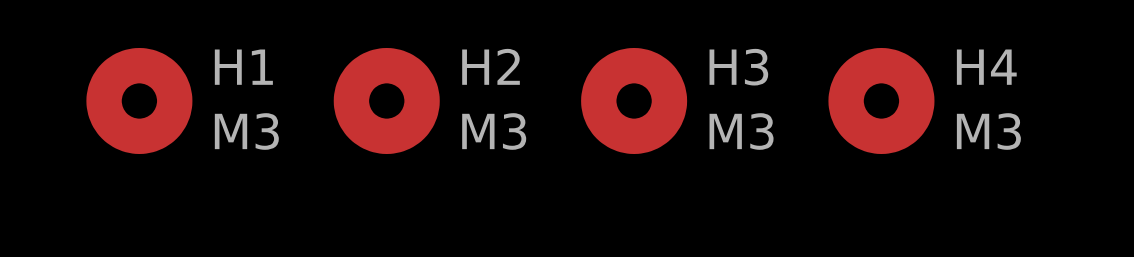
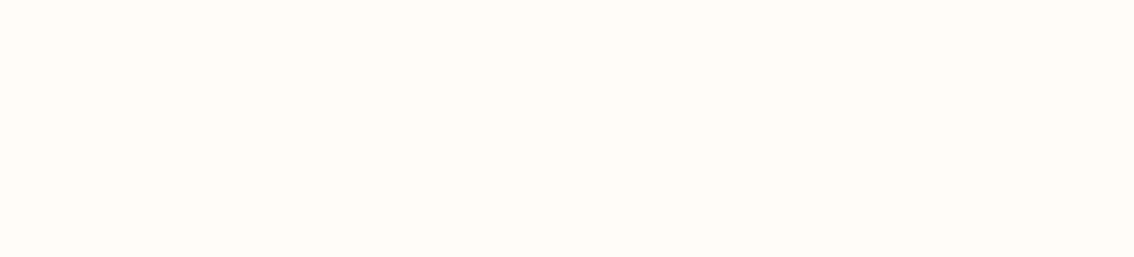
H1: M3 (139, 100) -> none
H2: M3 (386, 100) -> none
H3: M3 (634, 100) -> none
H4: M3 (881, 100) -> none

